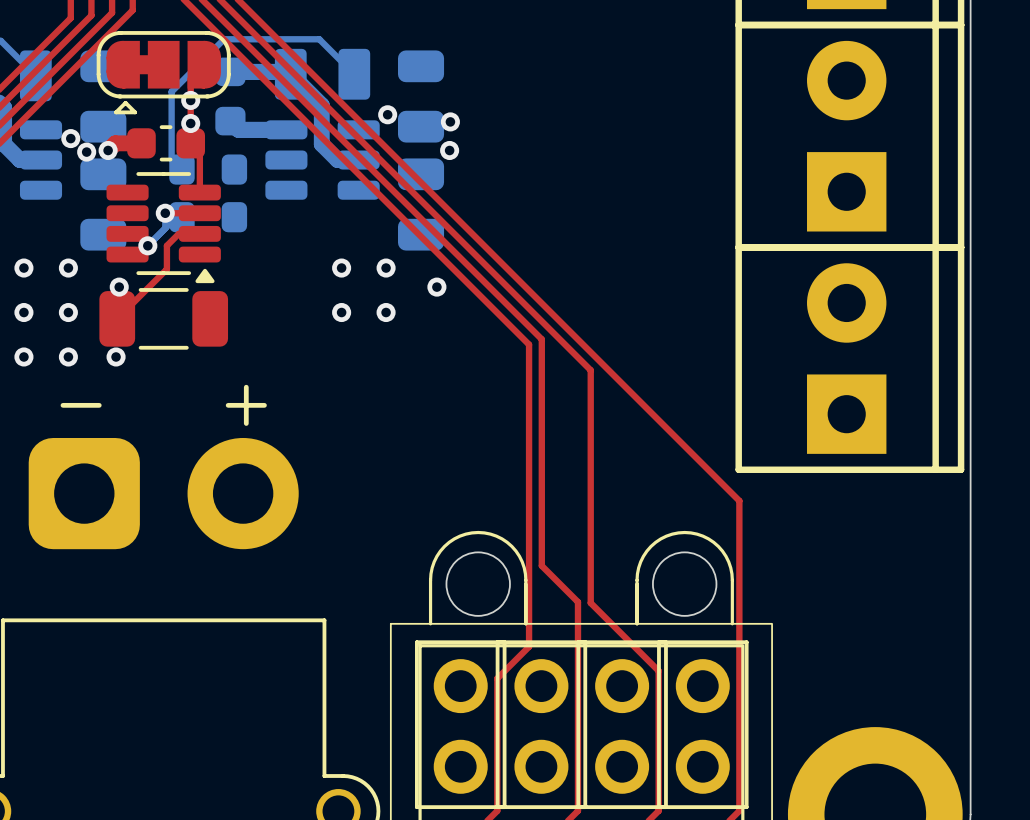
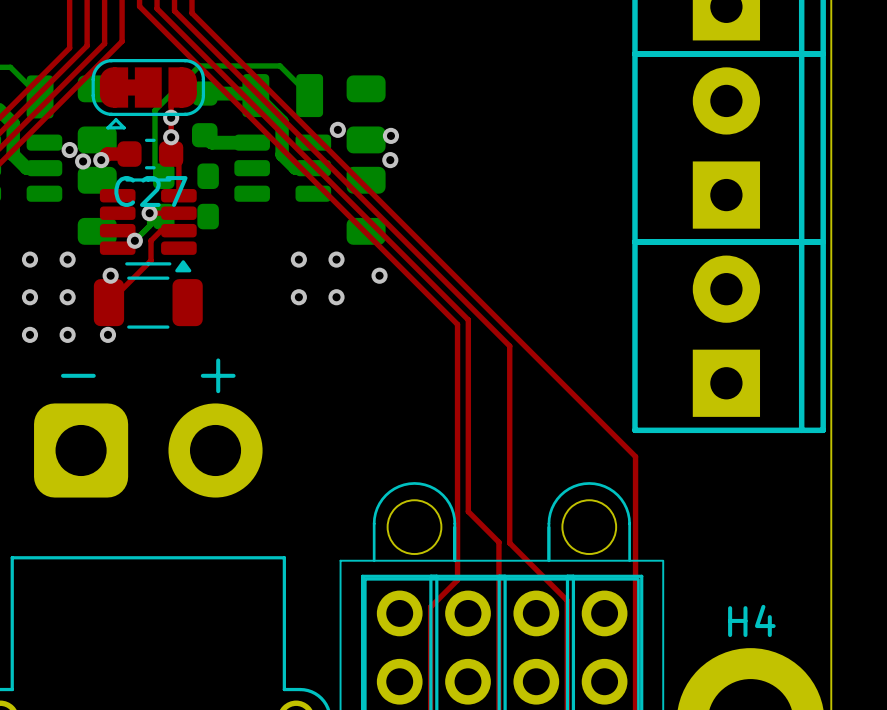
C27 name: none -> C27 (150, 191)
H4 name: none -> H4 (751, 620)

